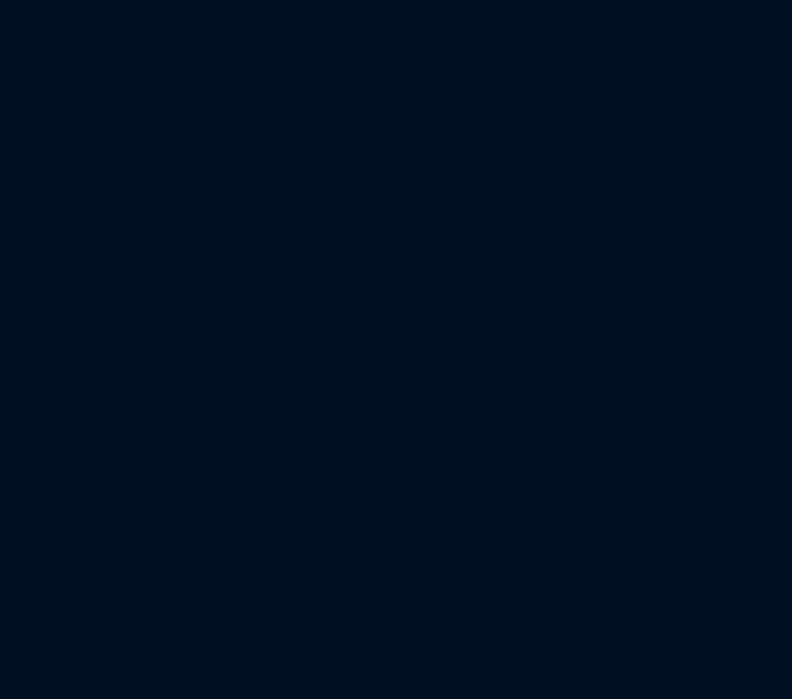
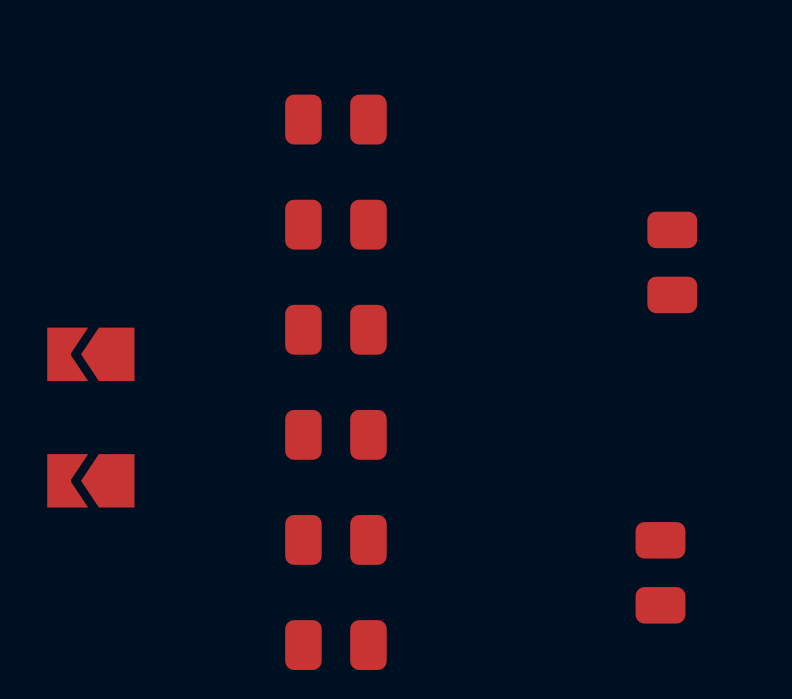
part: none -> (335, 119)
part: none -> (335, 224)
part: none -> (672, 262)
part: none -> (335, 329)
part: none -> (90, 354)
part: none -> (335, 434)
part: none -> (90, 480)
part: none -> (335, 539)
part: none -> (660, 572)
part: none -> (335, 645)

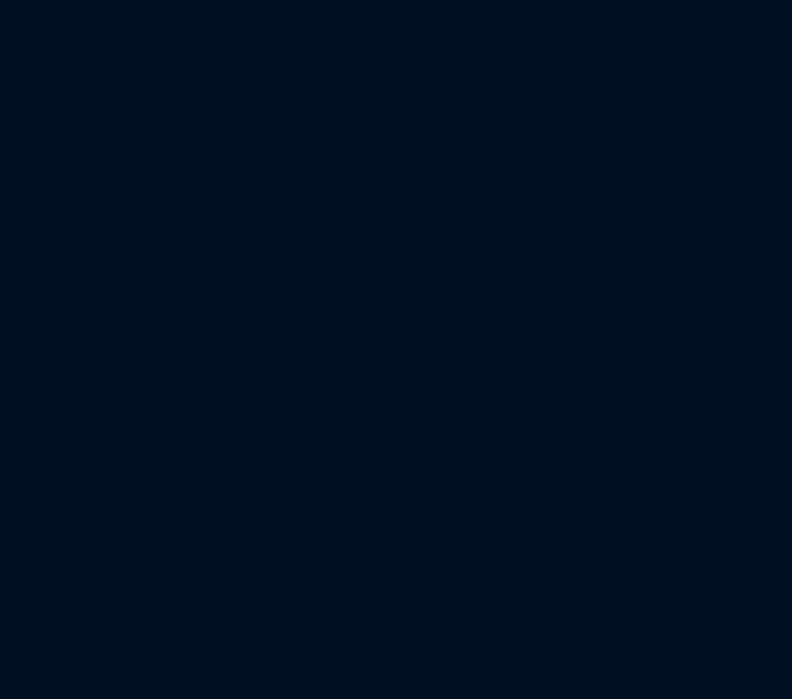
part: (335, 119) -> none
part: (335, 224) -> none
part: (672, 262) -> none
part: (335, 329) -> none
part: (90, 354) -> none
part: (335, 434) -> none
part: (90, 480) -> none
part: (335, 539) -> none
part: (660, 572) -> none
part: (335, 645) -> none

